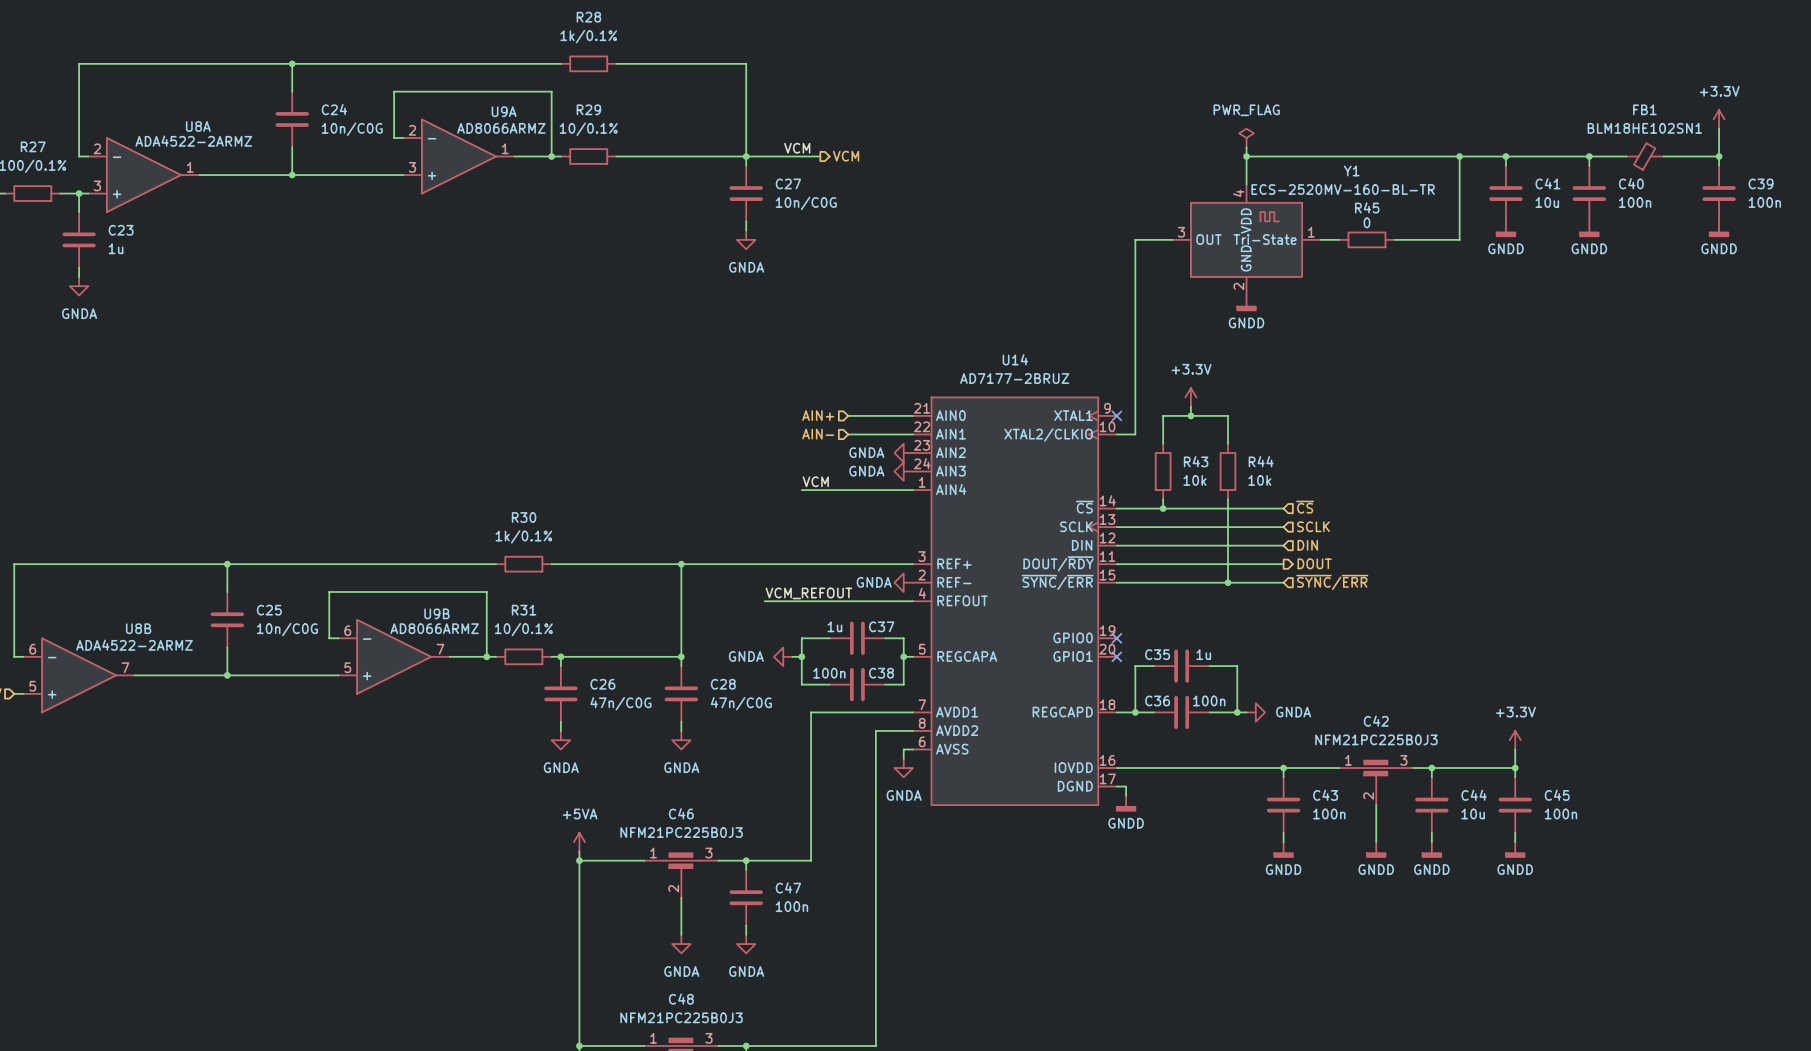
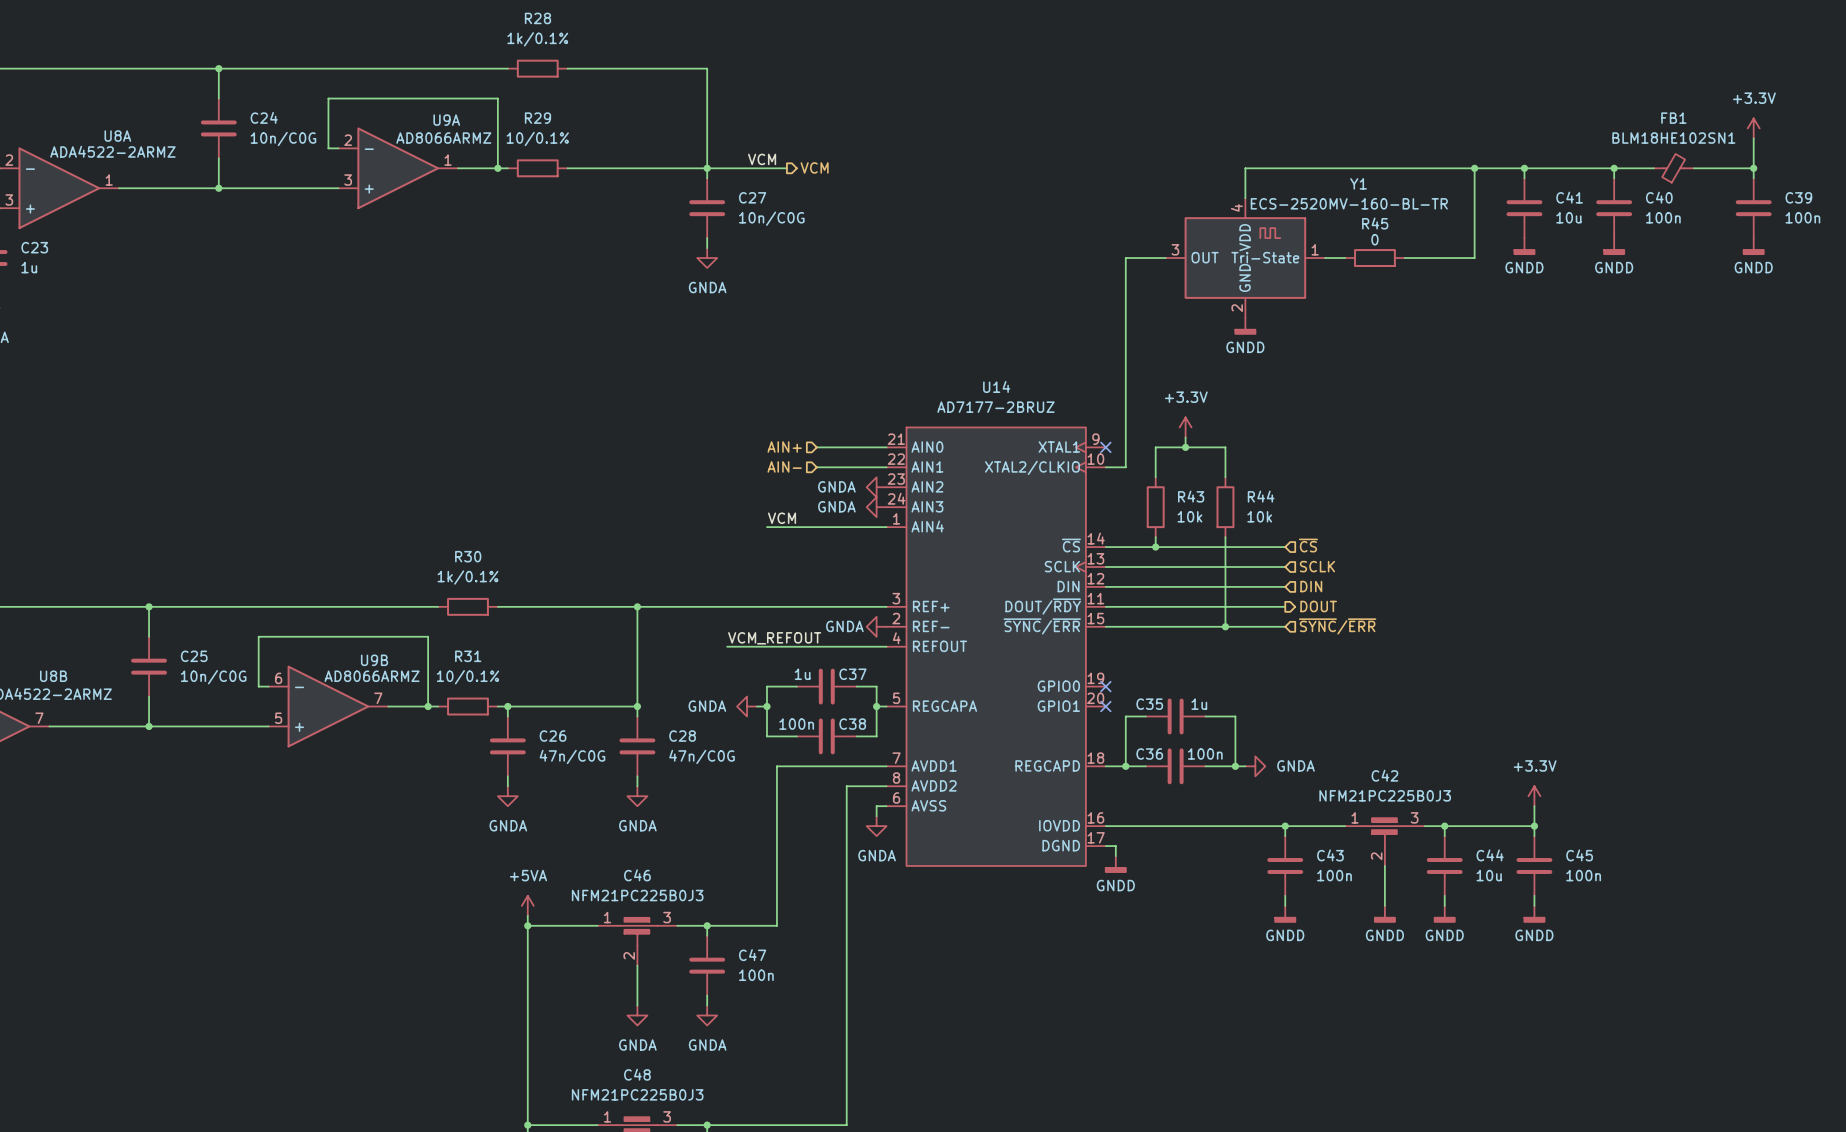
power symbol: PWR_FLAG (1246, 137) -> none
wire: (1246, 147) (1246, 156) -> none
junction: (1246, 156) -> none

